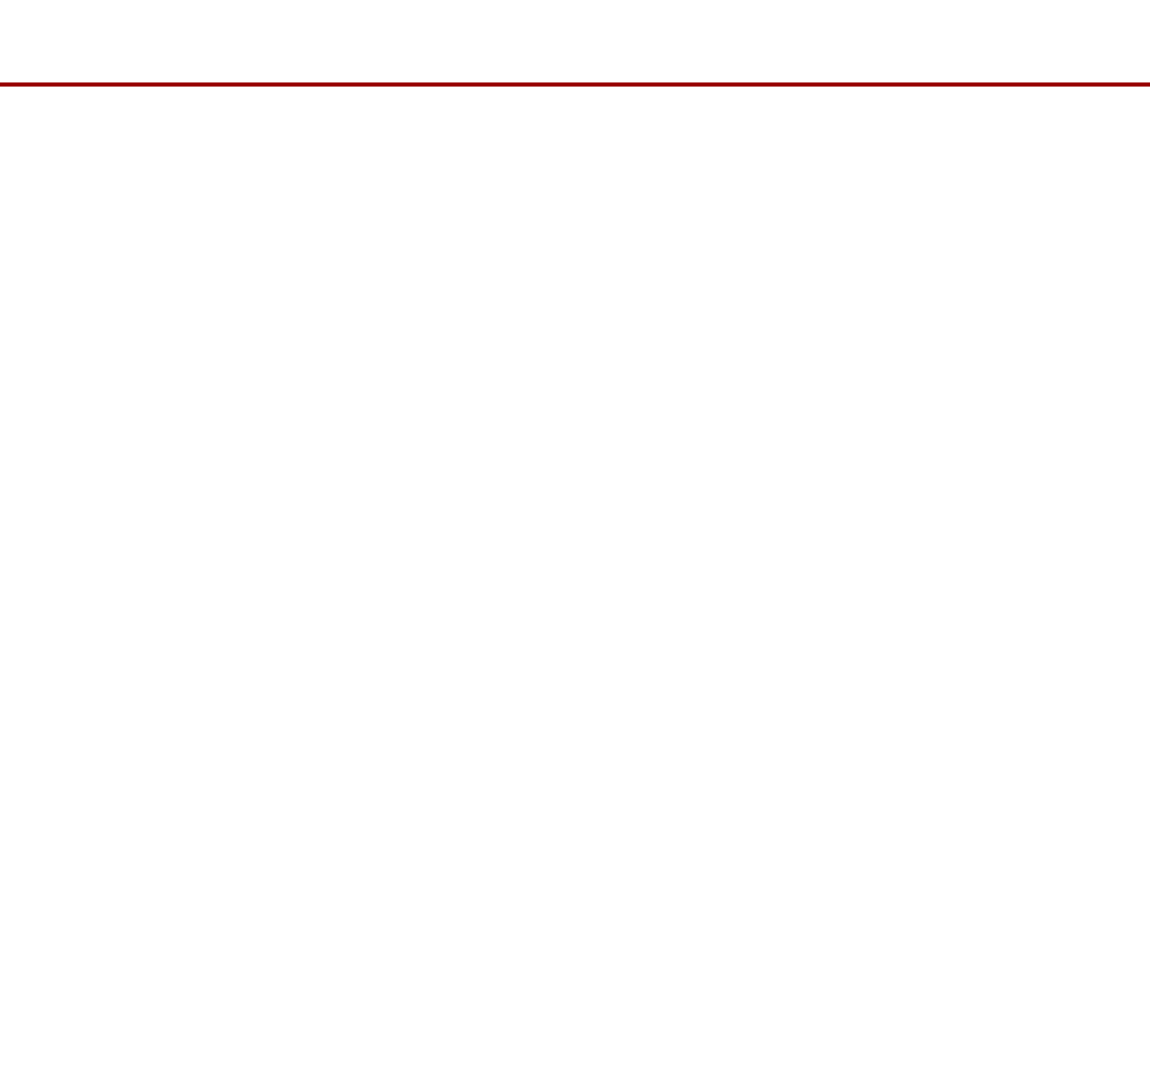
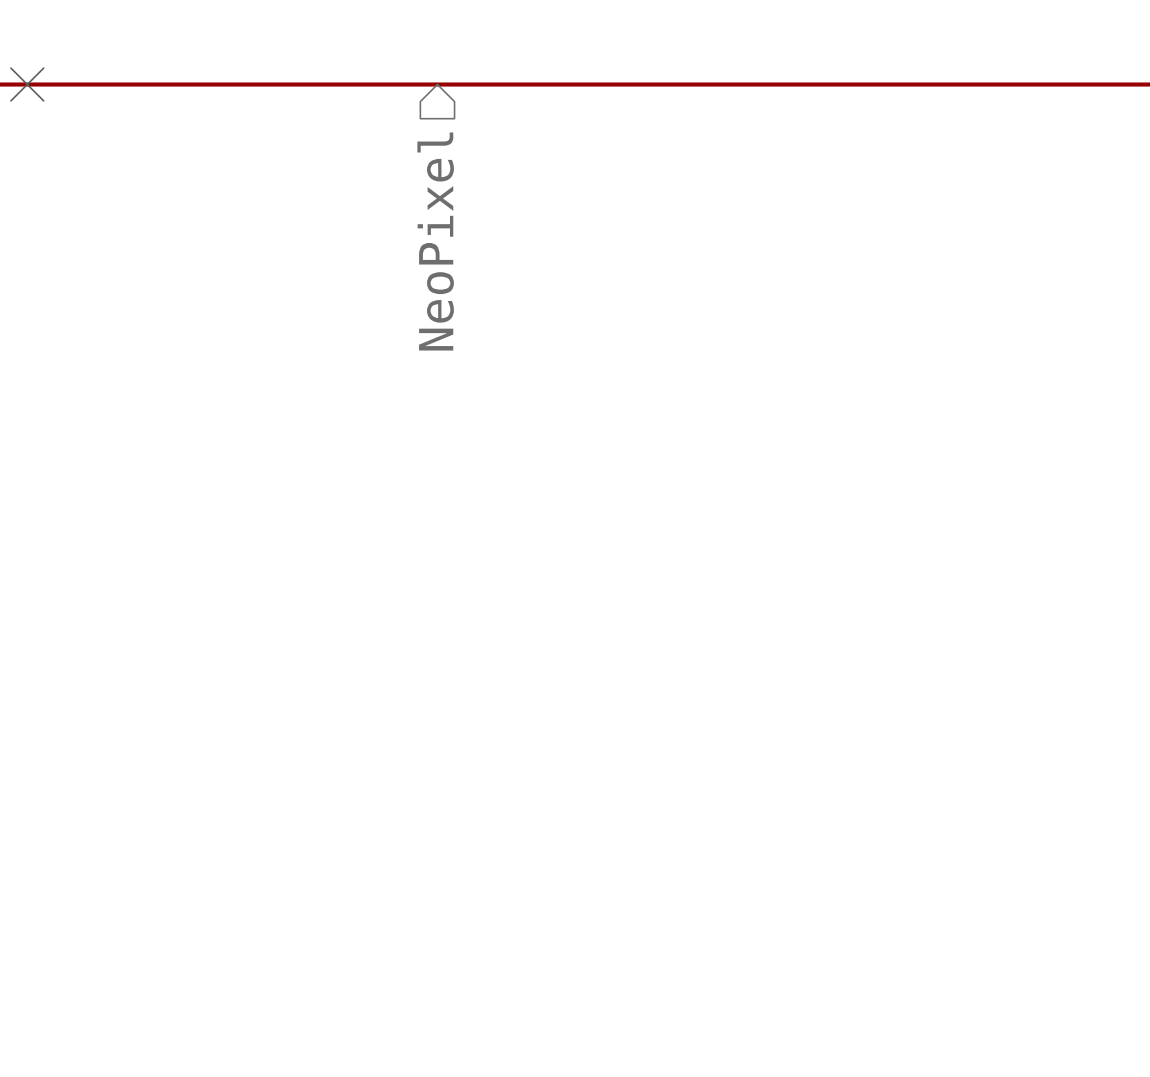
no-connect mark: none -> (27, 84)
sheet pin: none -> NeoPixel (435, 241)

